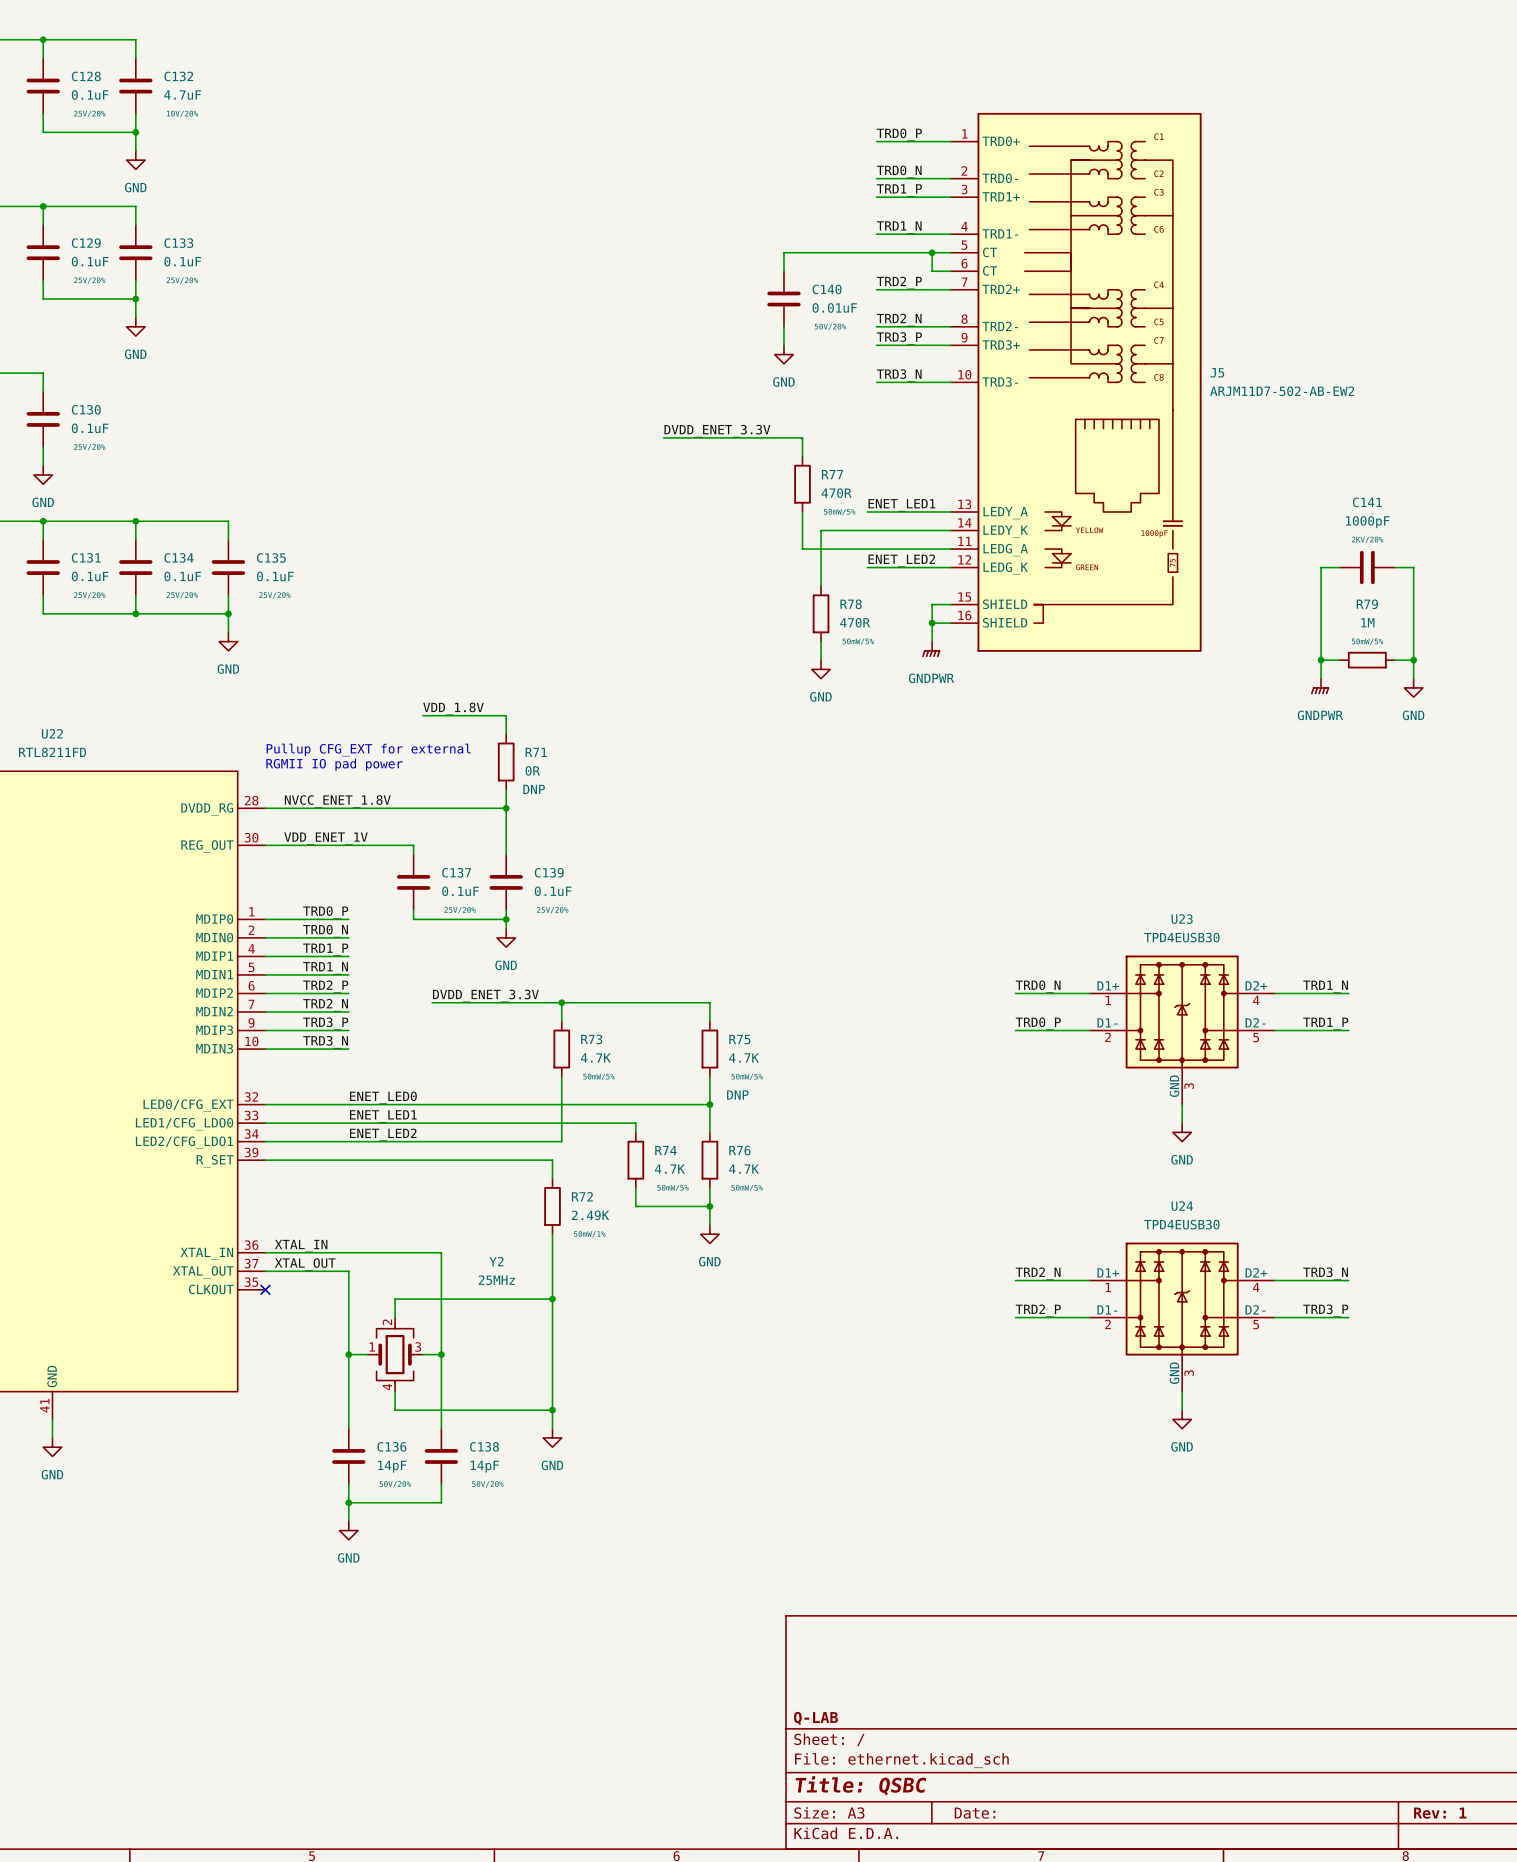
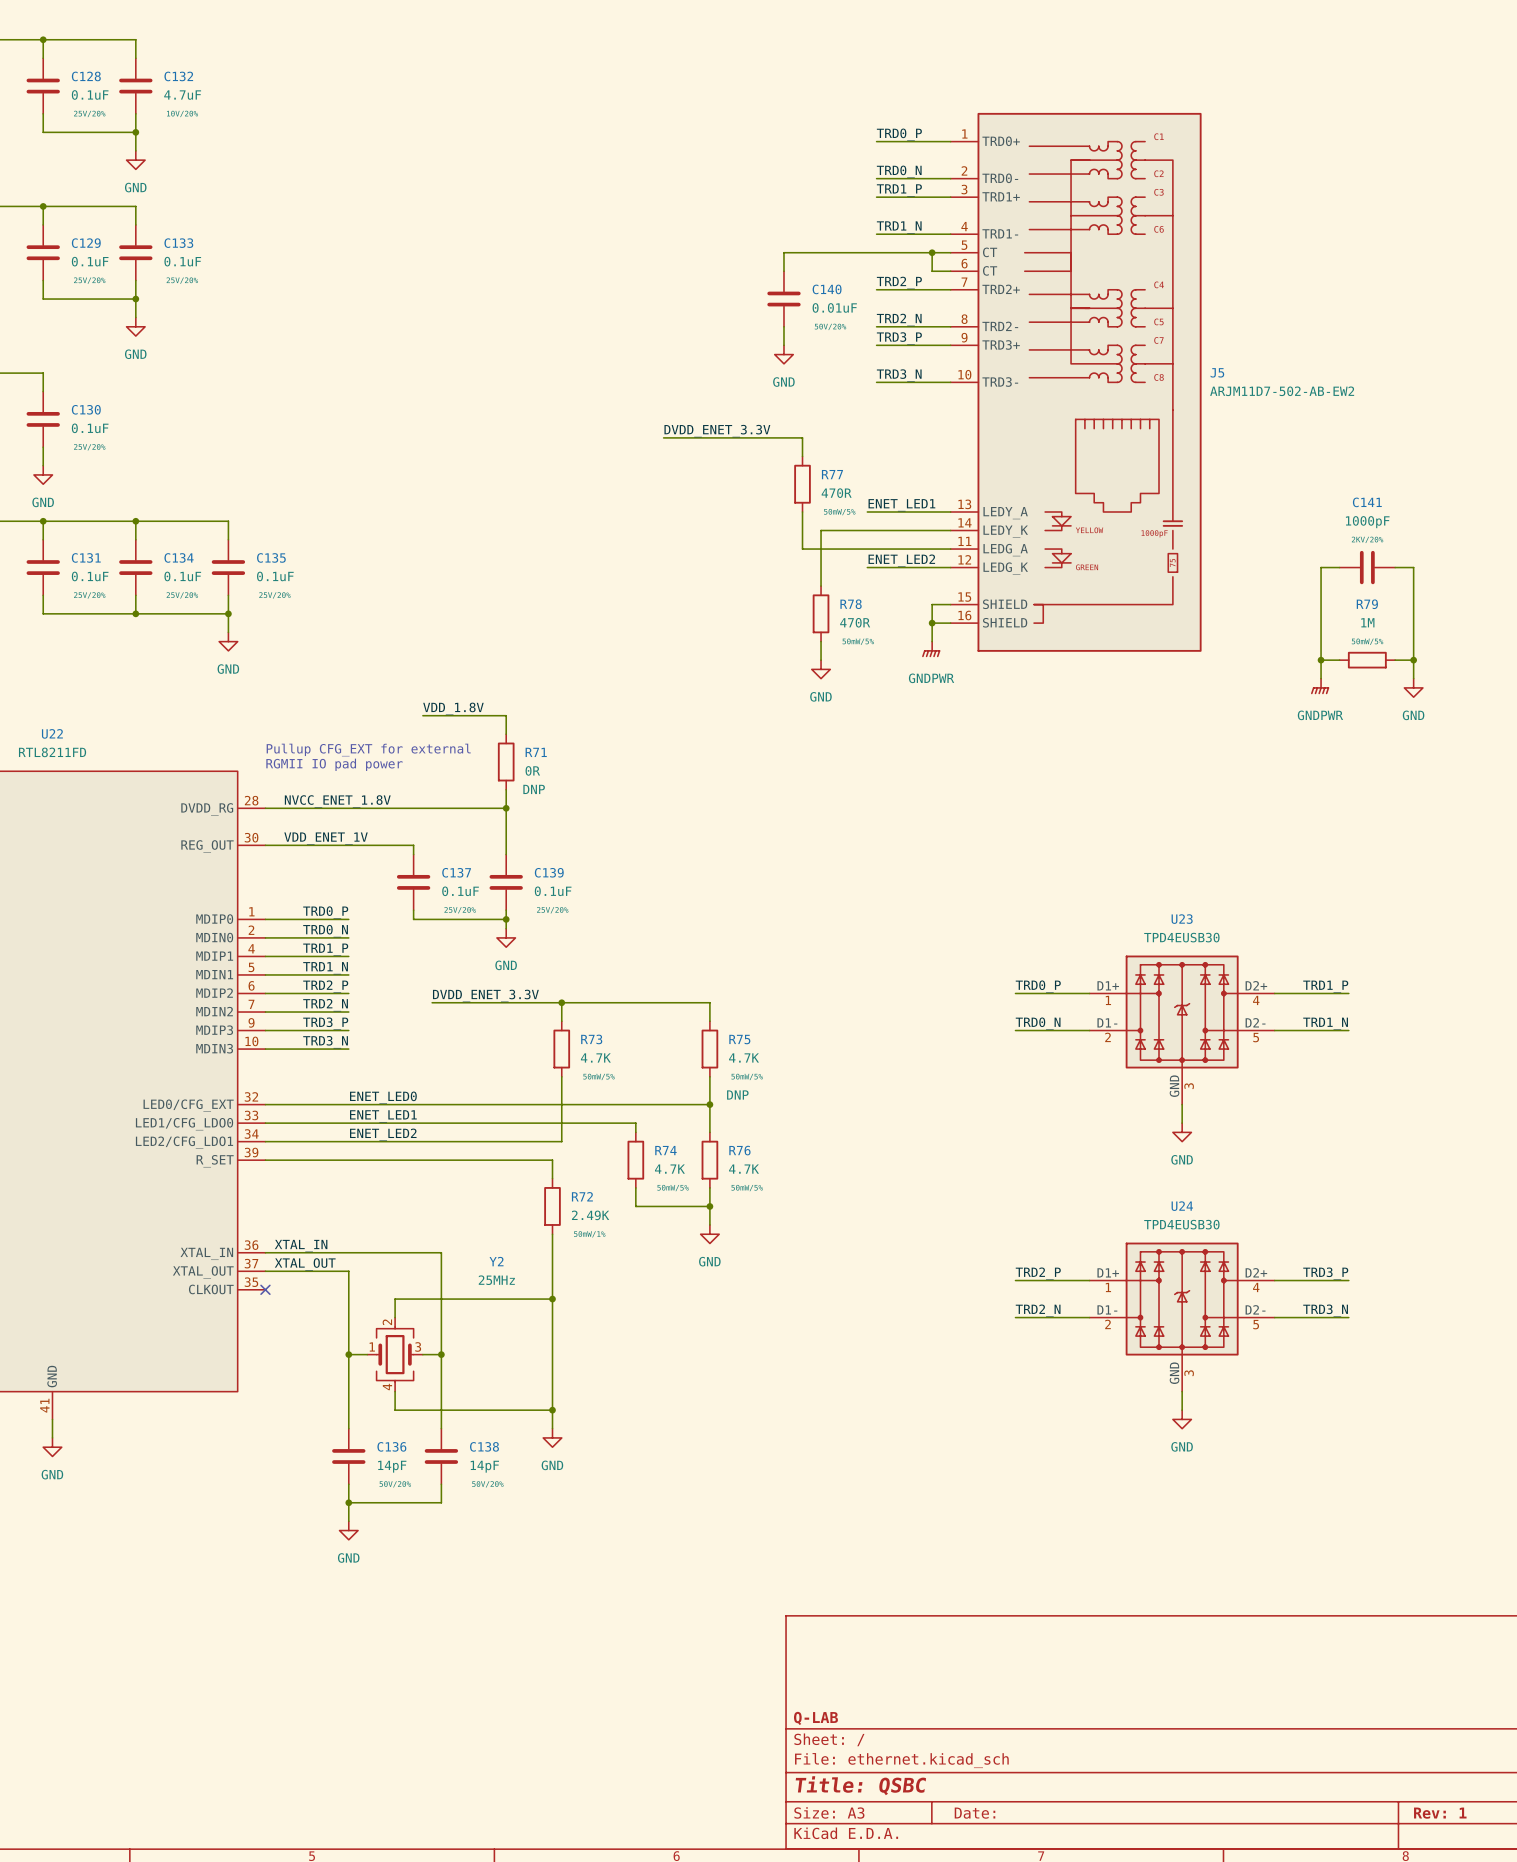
label: TRD0_N (1038, 986) -> TRD0_P (1038, 986)
label: TRD1_N (1325, 986) -> TRD1_P (1325, 986)
label: TRD0_P (1038, 1023) -> TRD0_N (1038, 1023)
label: TRD1_P (1325, 1023) -> TRD1_N (1325, 1023)
label: TRD2_N (1038, 1273) -> TRD2_P (1038, 1273)
label: TRD3_N (1325, 1273) -> TRD3_P (1325, 1273)
label: TRD2_P (1038, 1310) -> TRD2_N (1038, 1310)
label: TRD3_P (1325, 1310) -> TRD3_N (1325, 1310)

